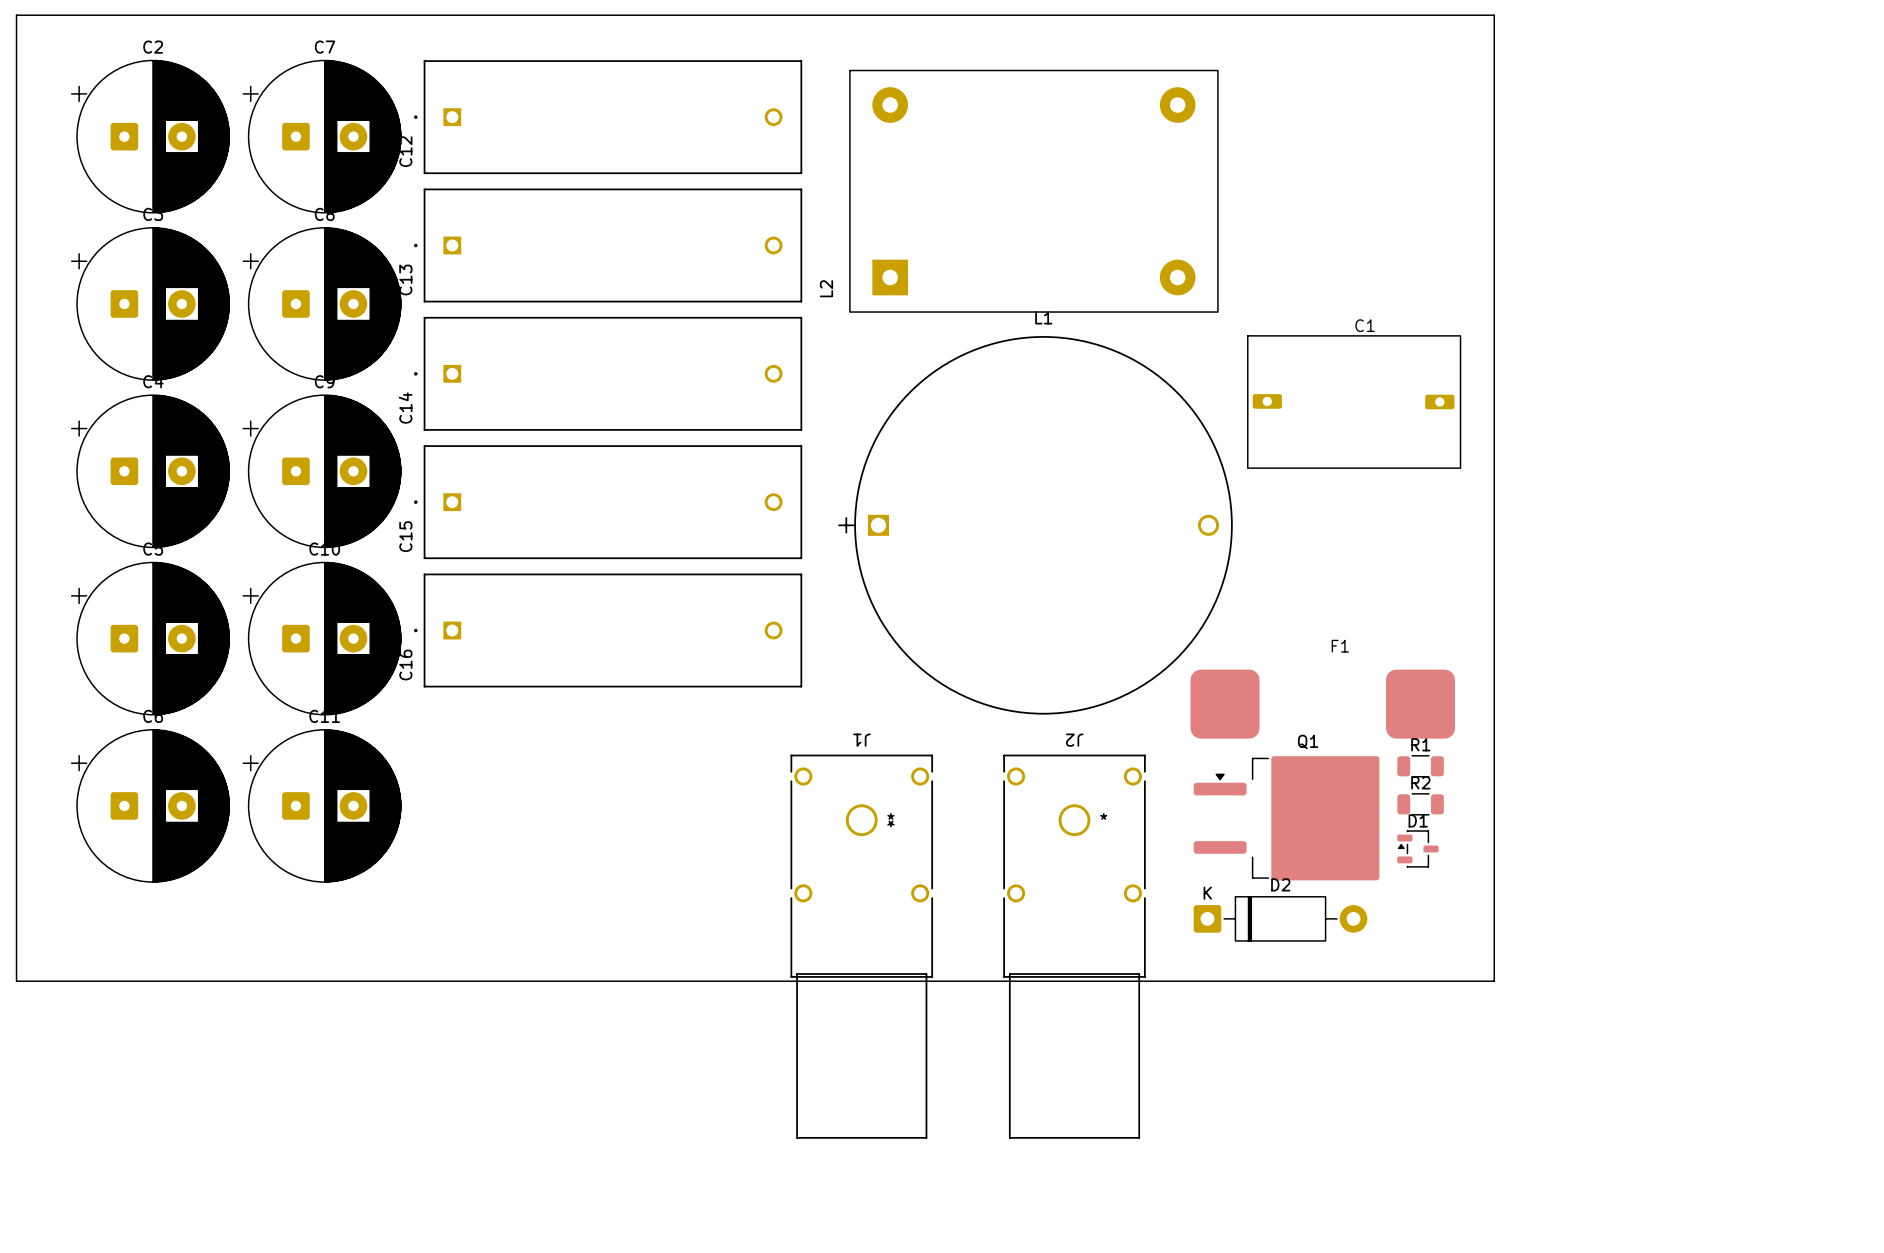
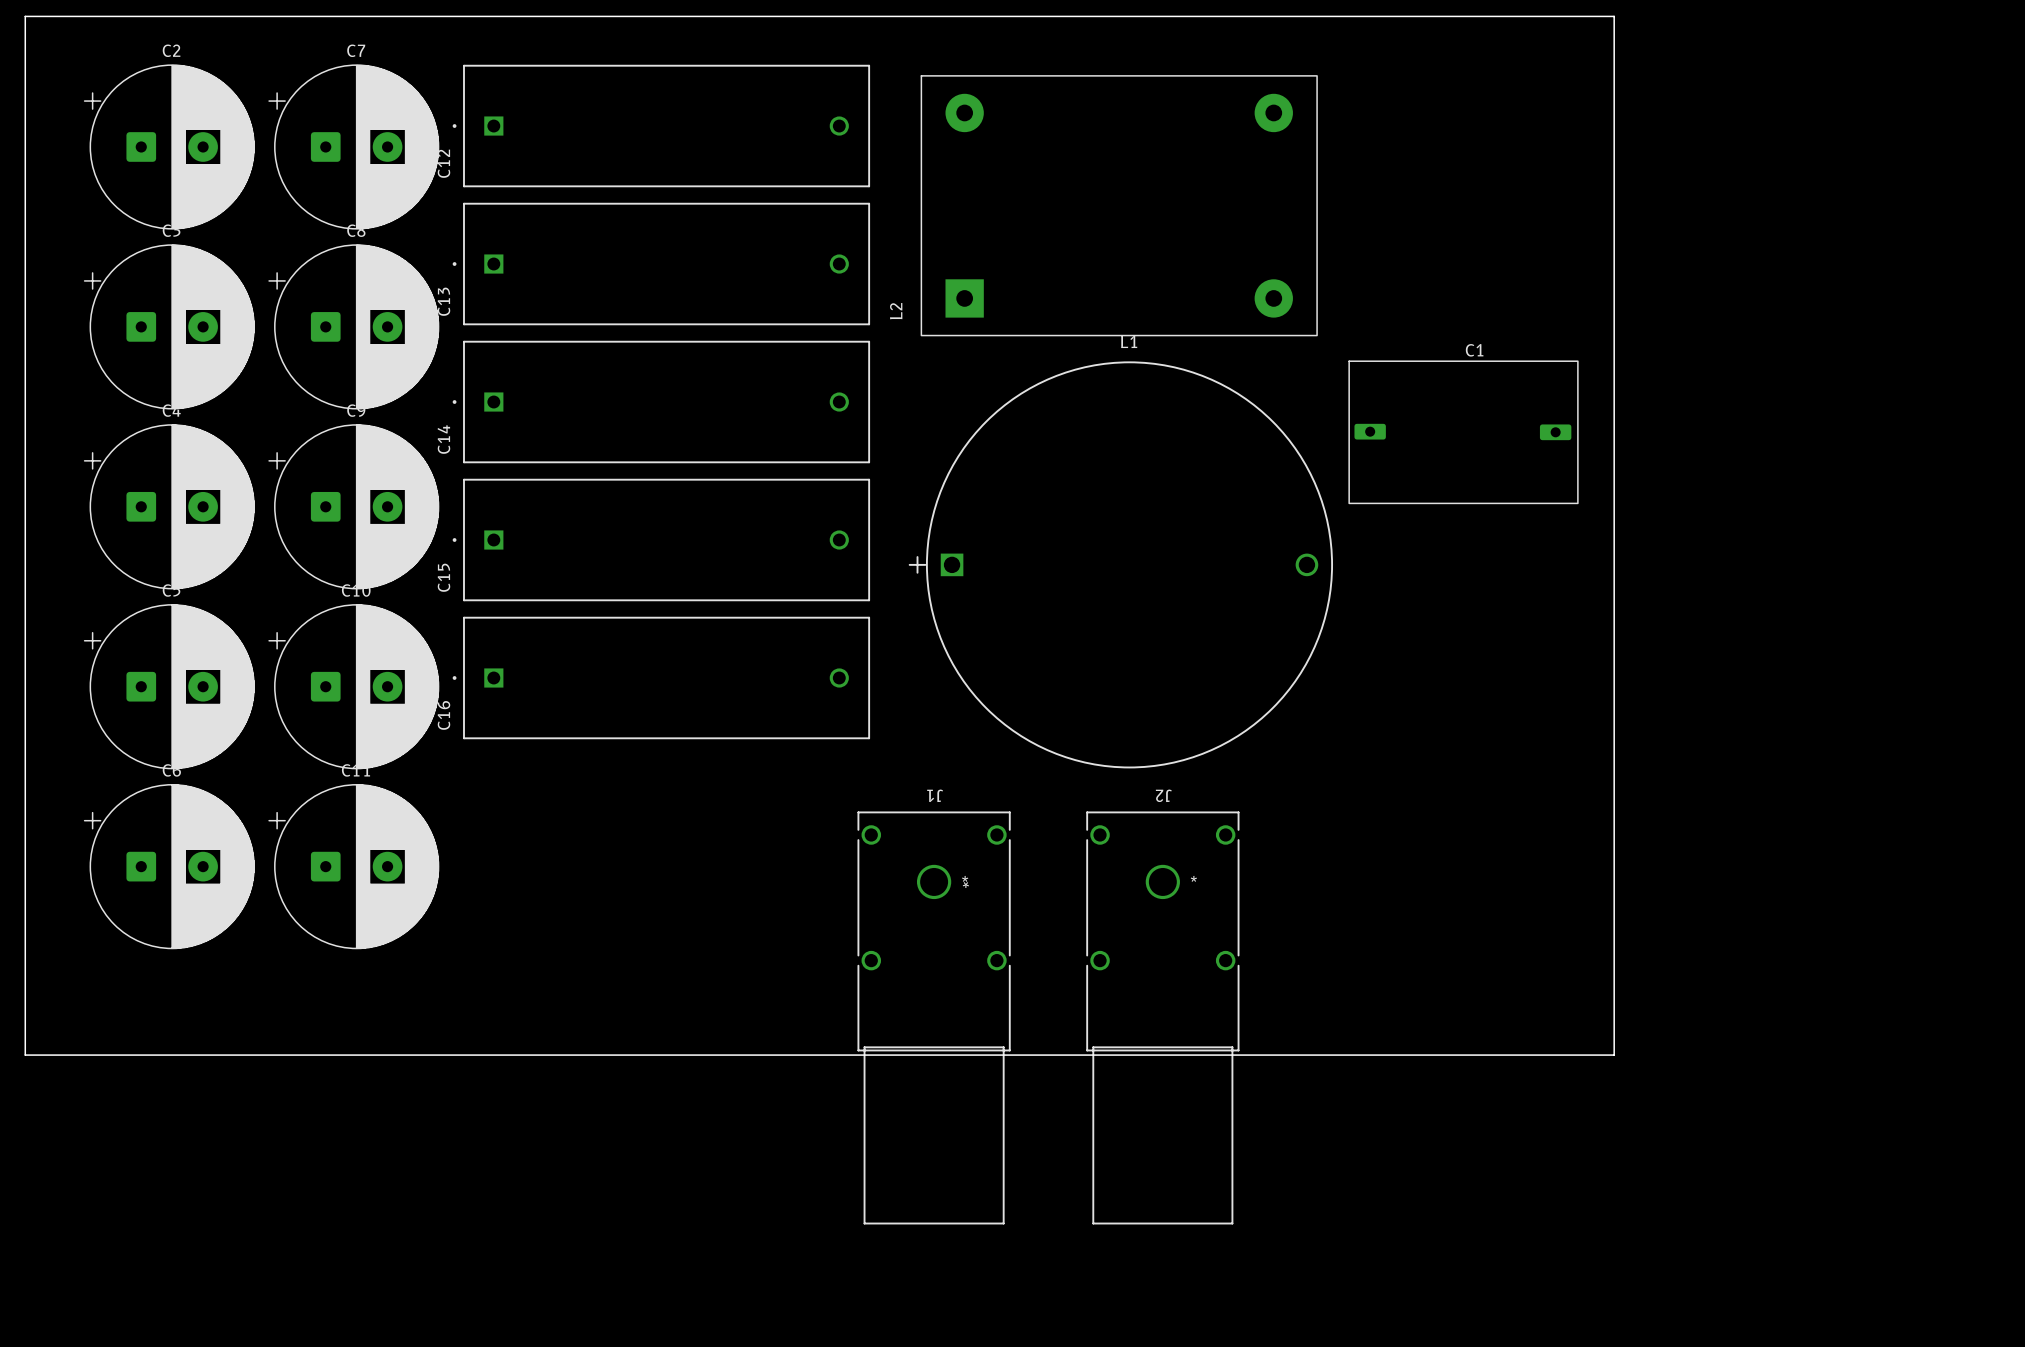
F1: (1322, 704) -> none
R1: (1420, 766) -> none
R2: (1420, 804) -> none
Q1: (1286, 818) -> none
D1: (1417, 848) -> none
D2: (1280, 918) -> none

